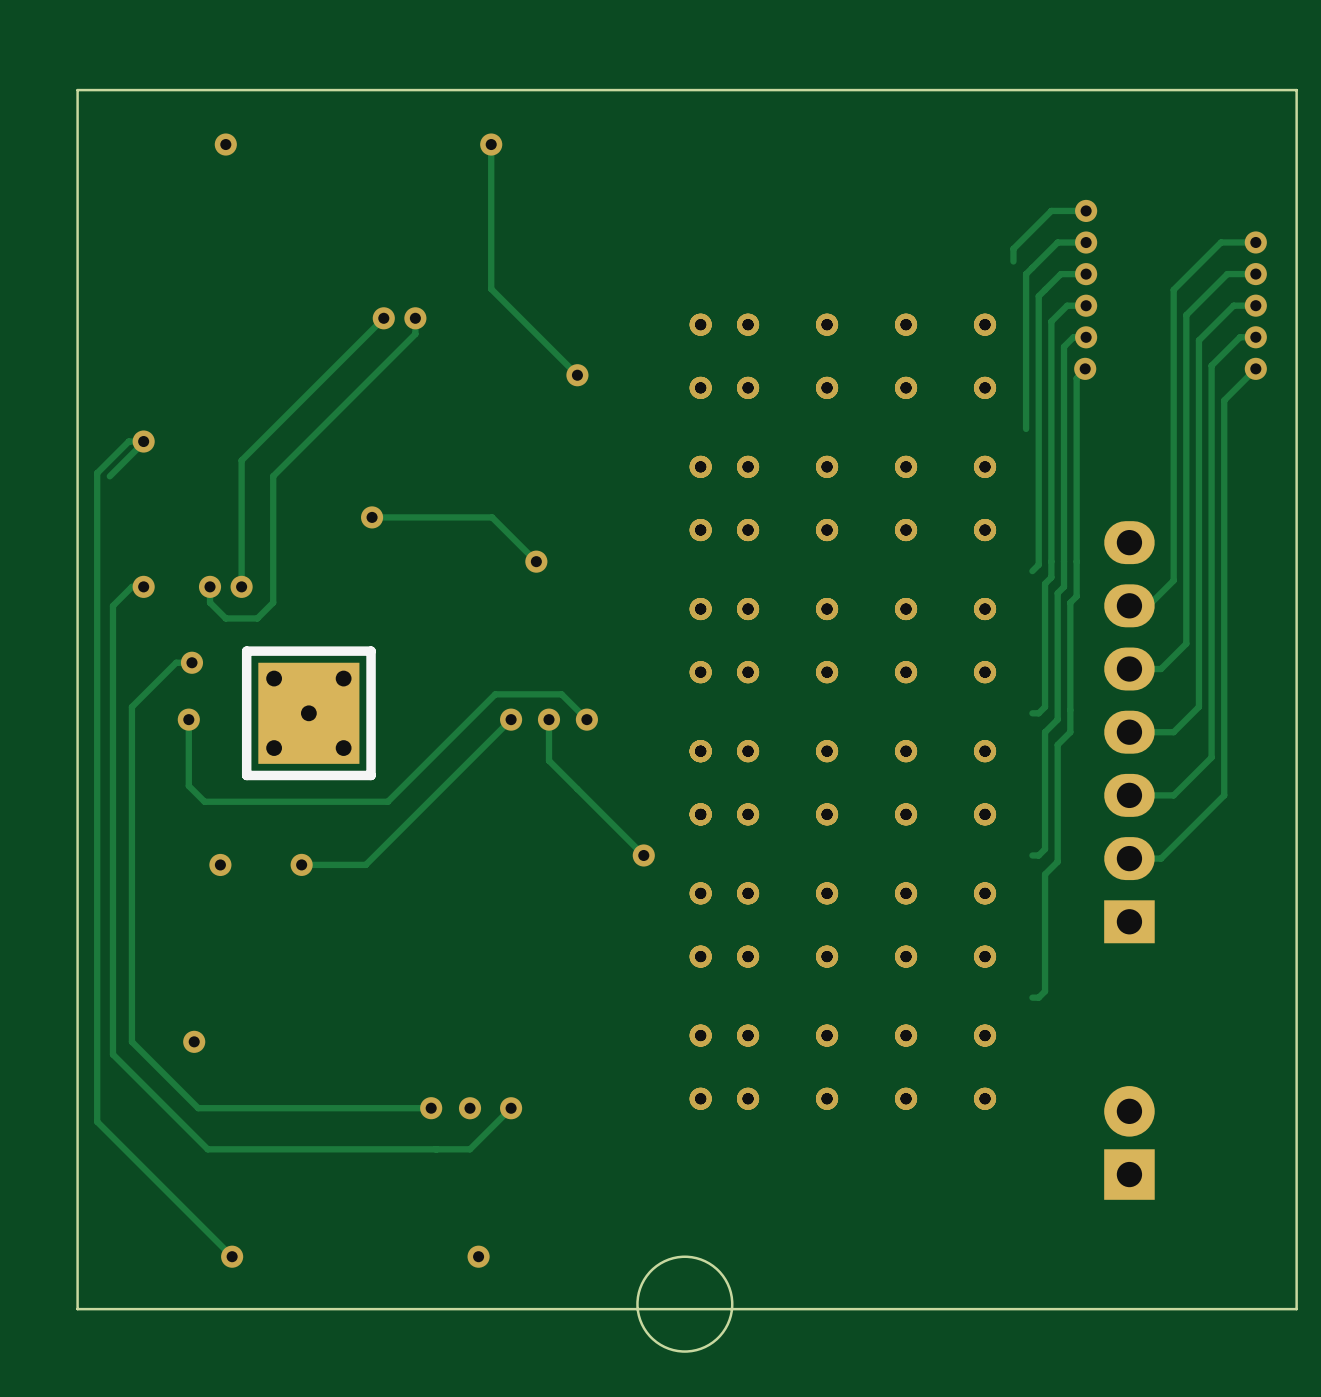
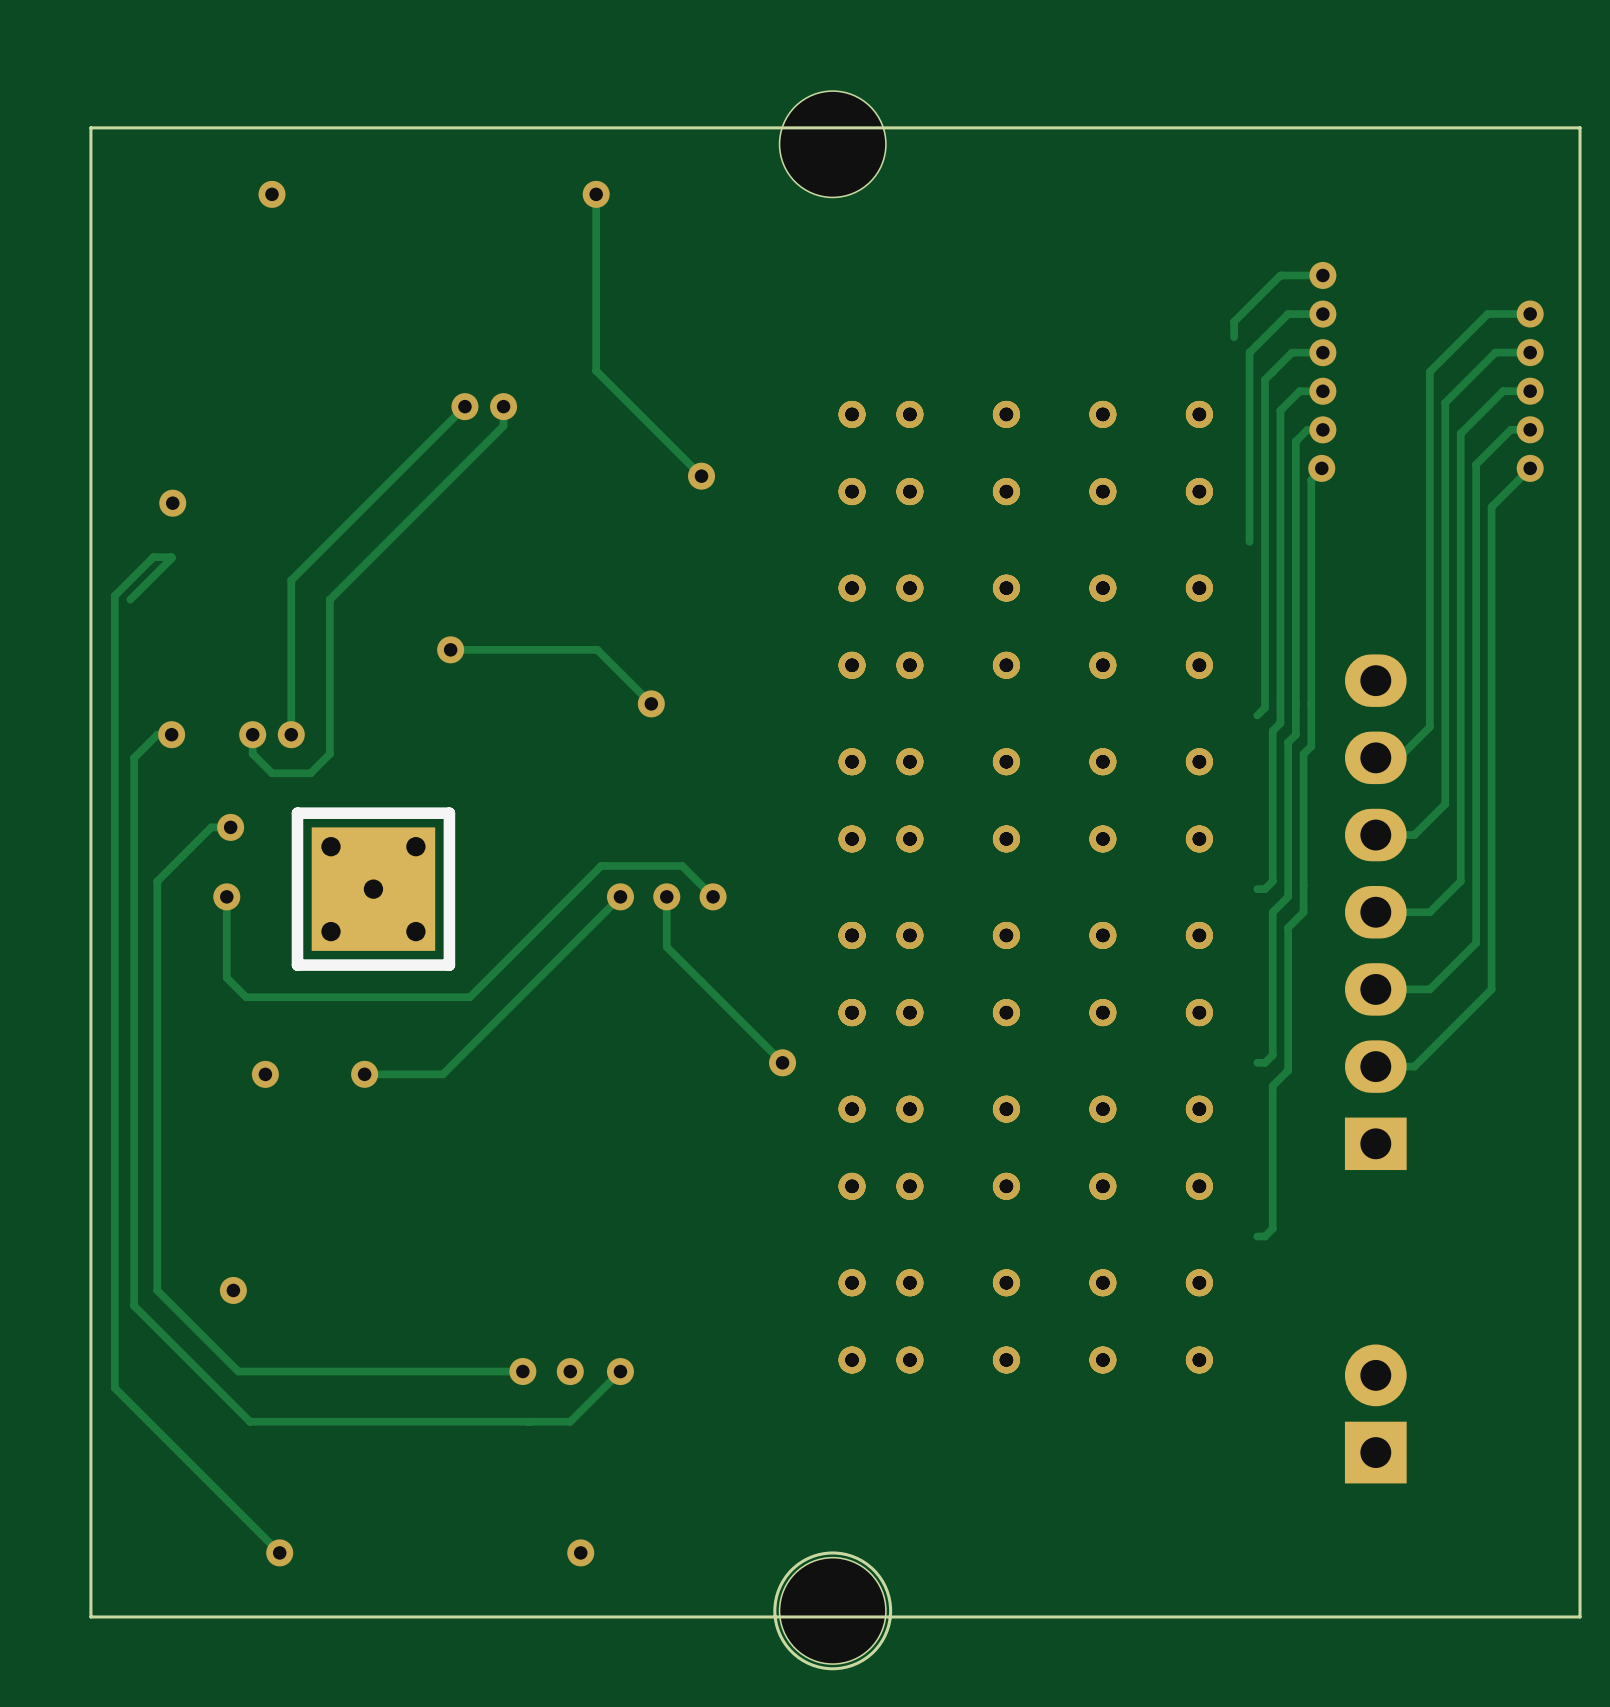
part: none -> (832, 144)
via position: (143, 441) -> (172, 503)
part: none -> (832, 1610)

